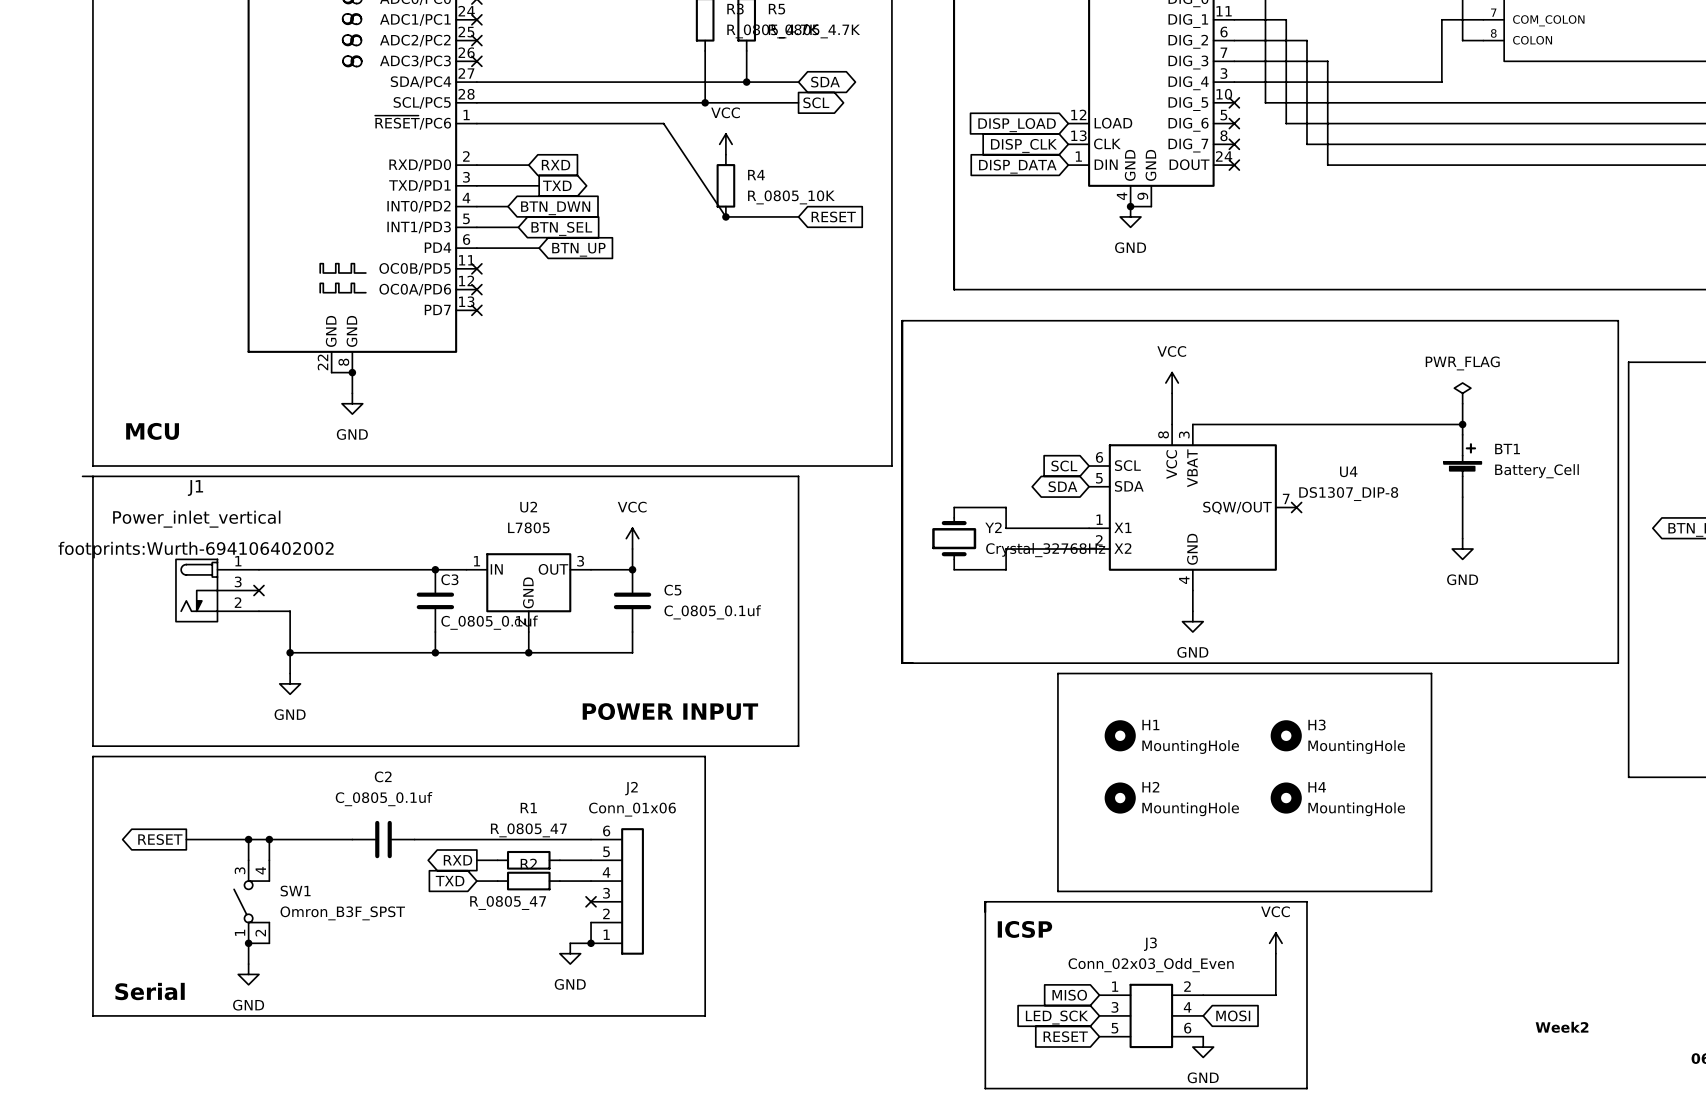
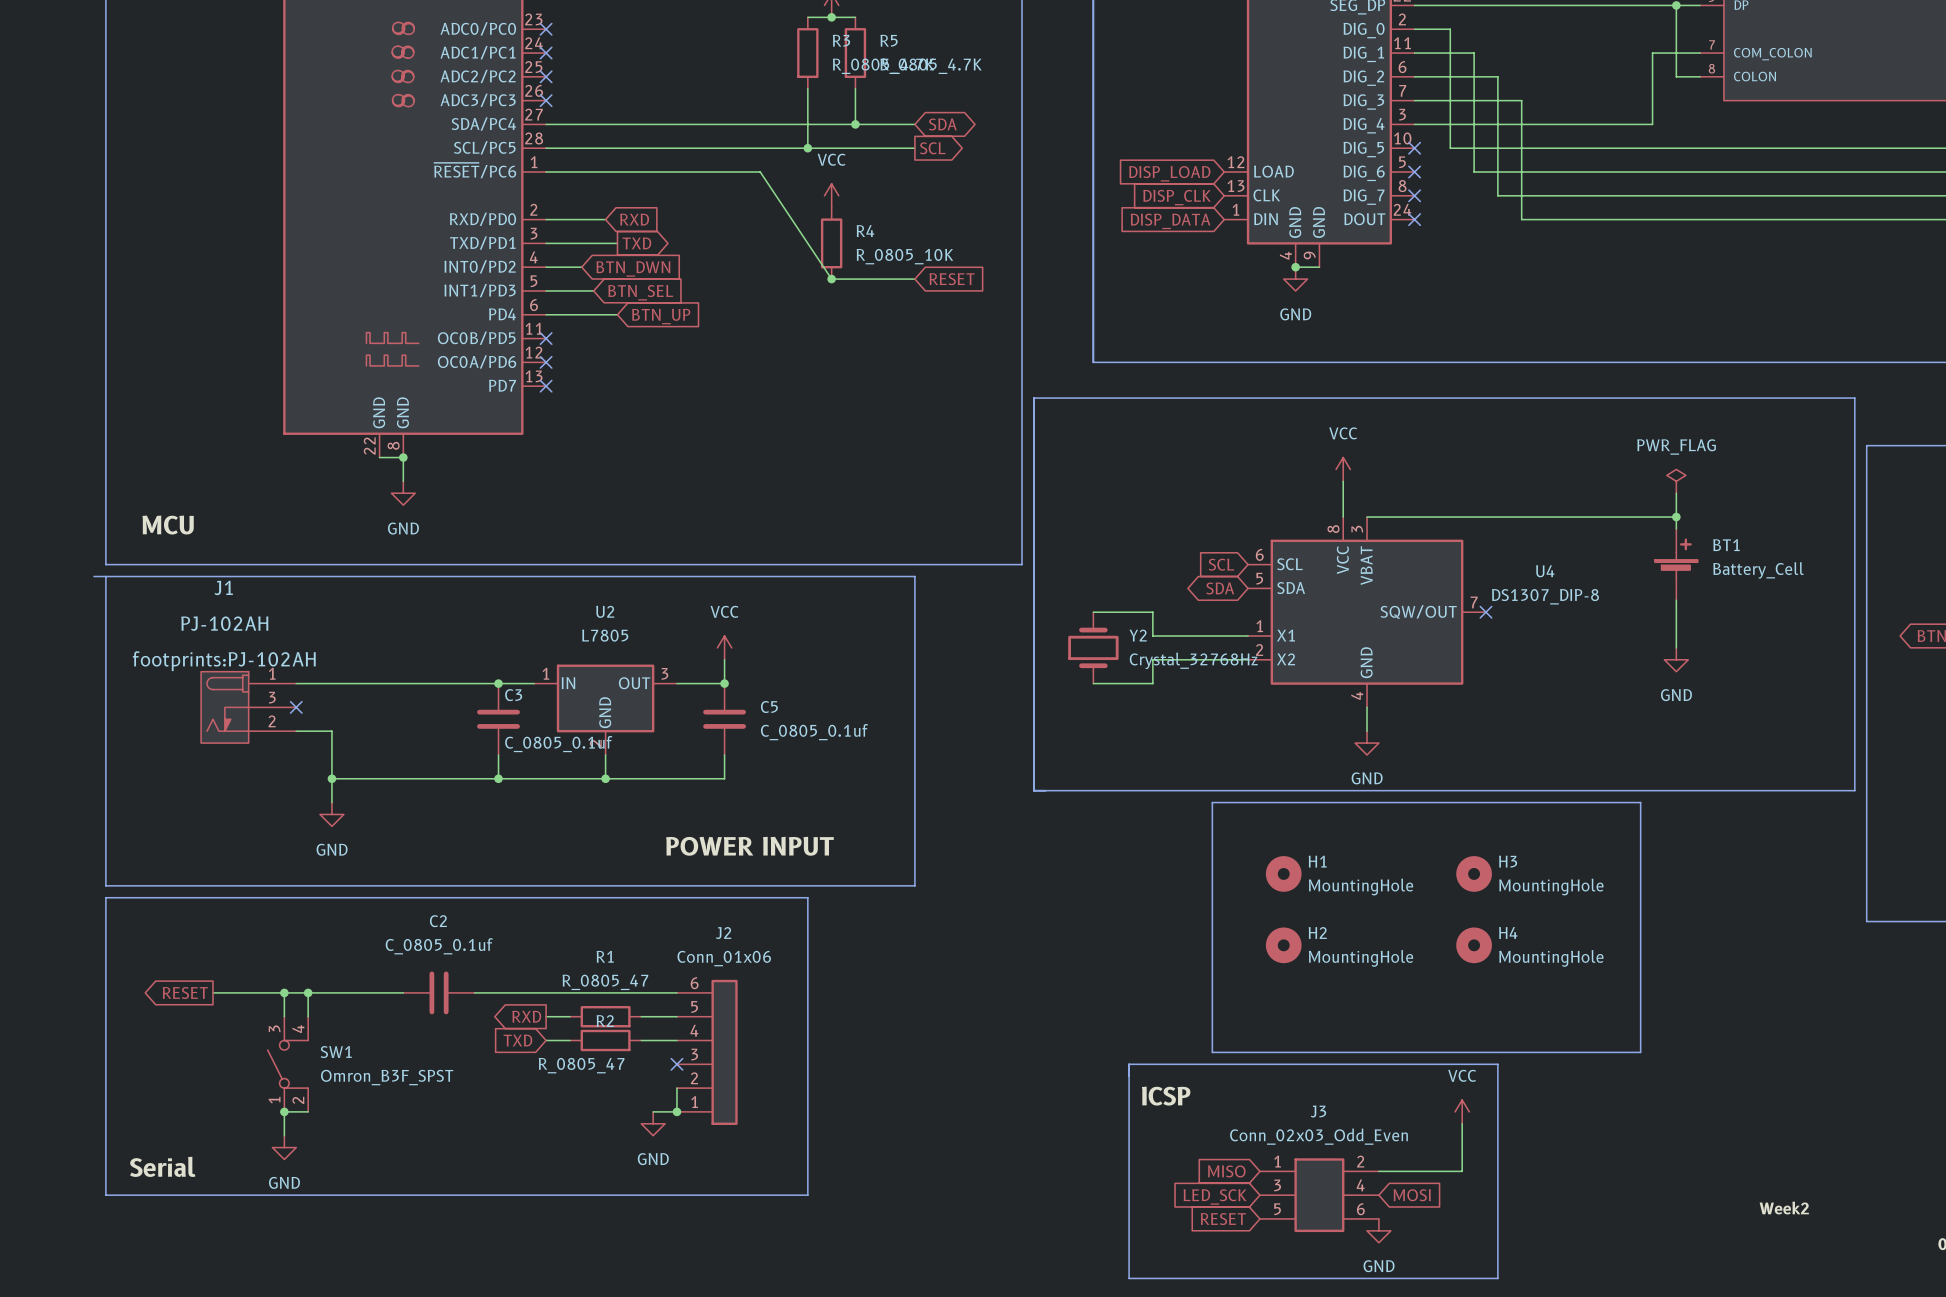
J1 value: Power_inlet_vertical (196, 519) -> PJ-102AH (224, 623)
J1 text: footprints:Wurth-694106402002 (196, 550) -> footprints:PJ-102AH (224, 661)

